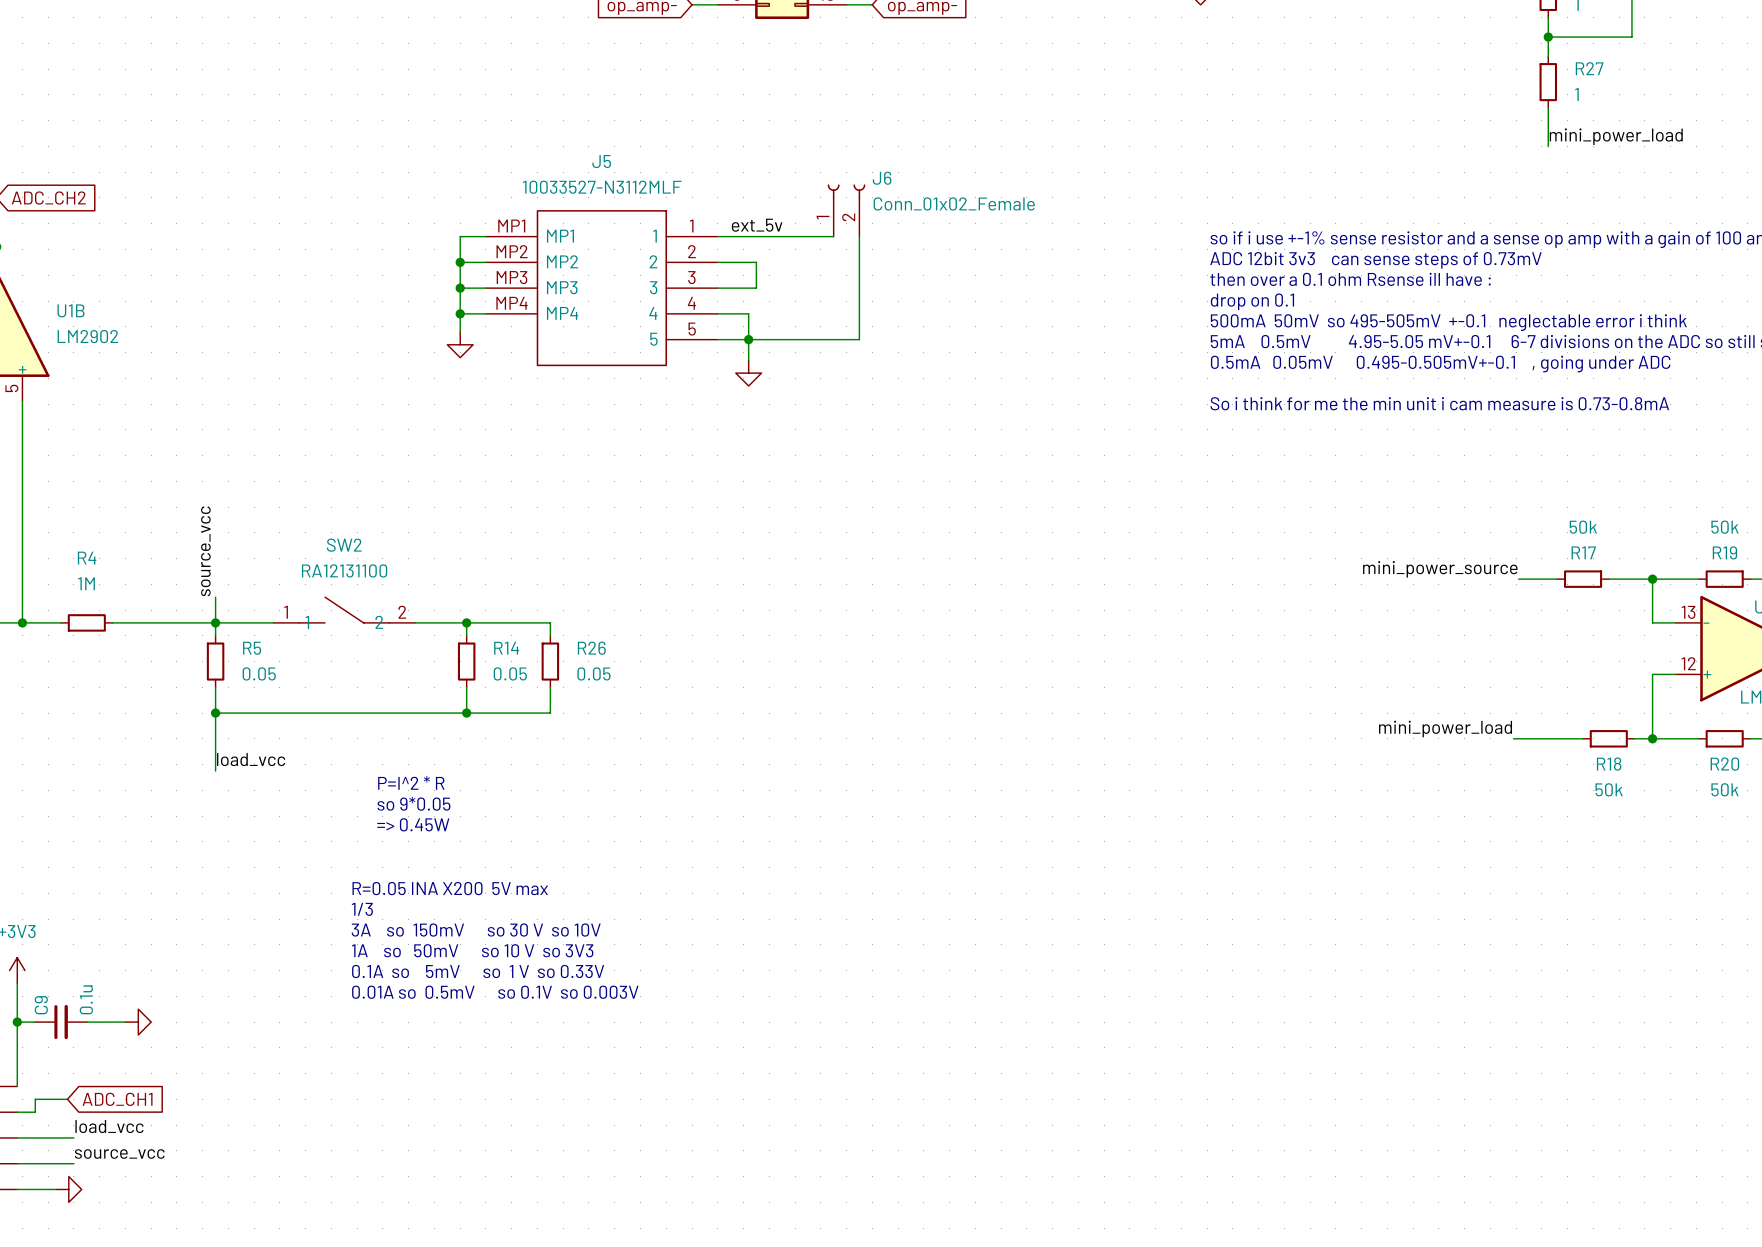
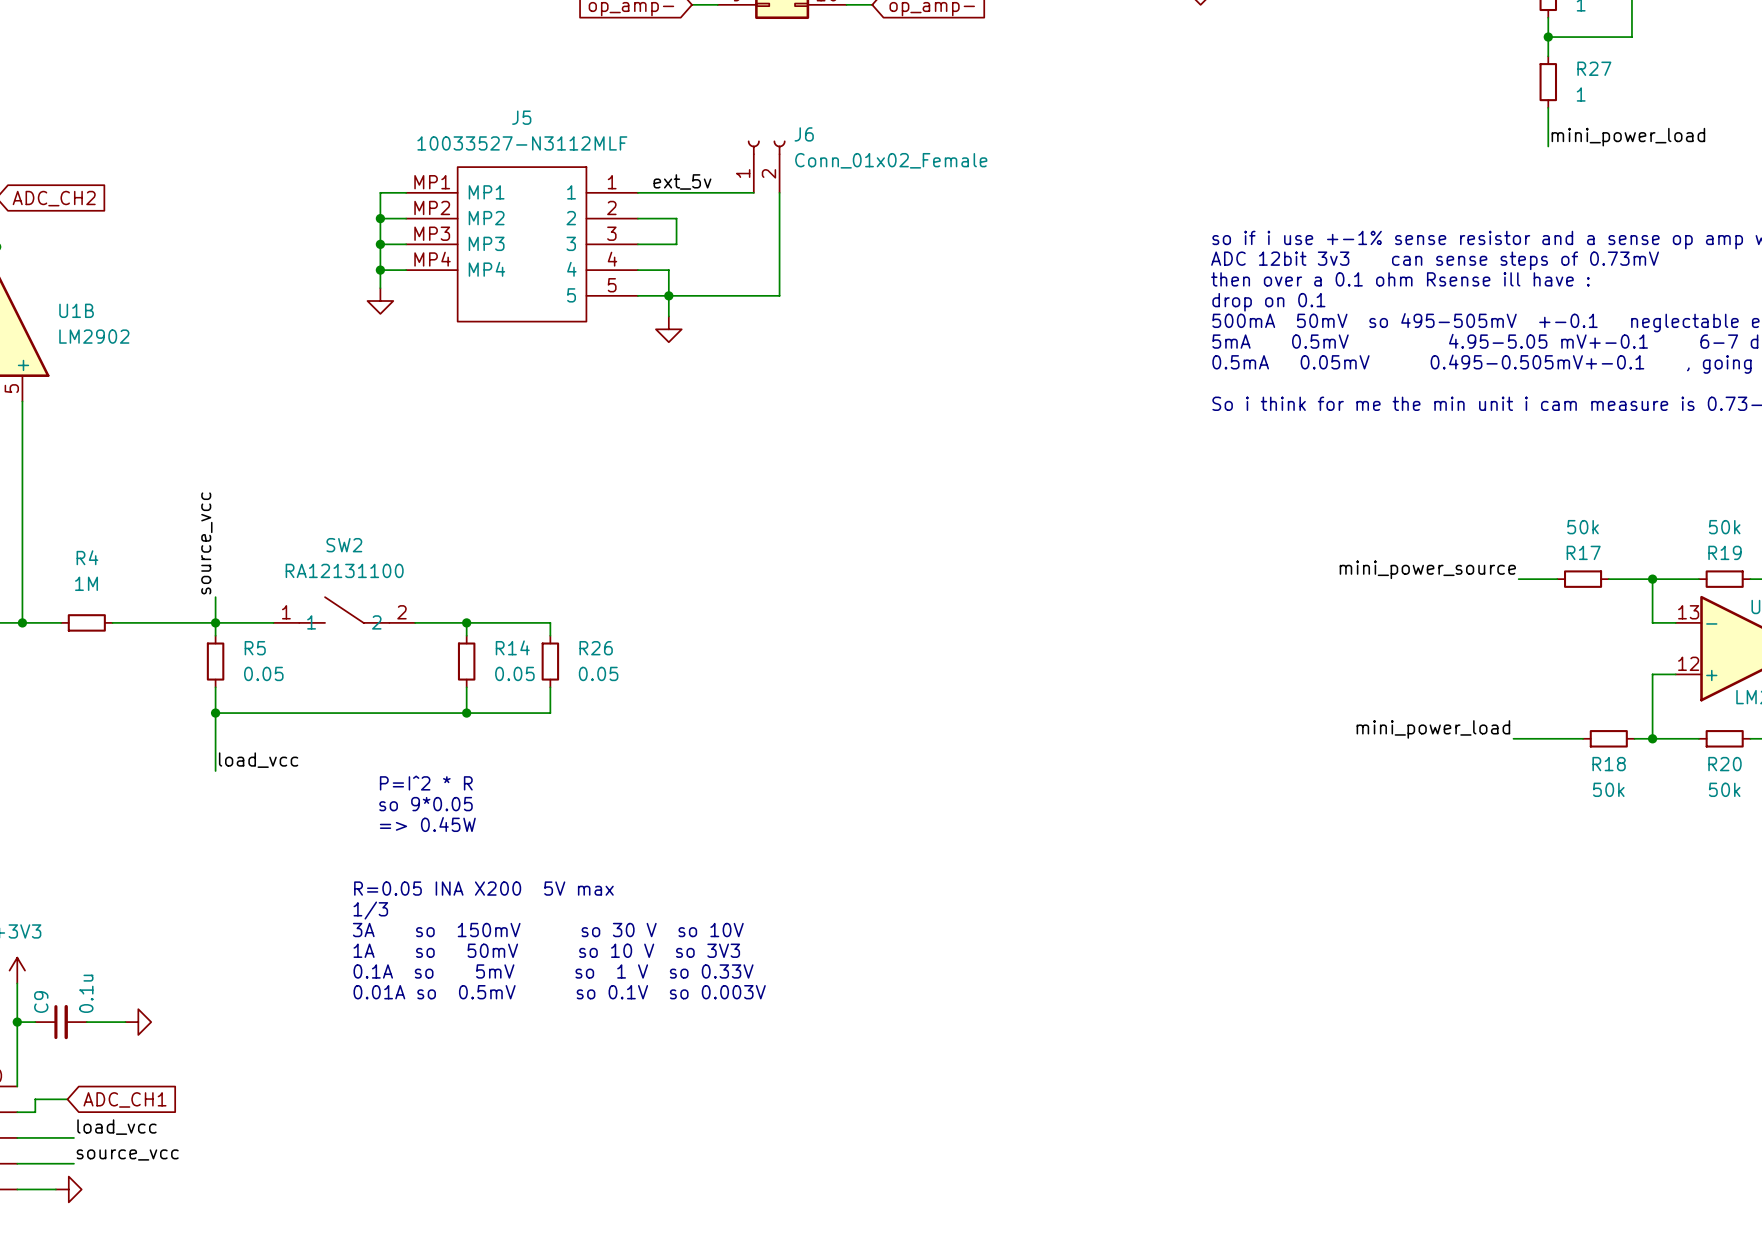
J6 position: (846, 210) -> (766, 166)
junction: none -> (380, 218)
label position: ext_5v (757, 225) -> ext_5v (682, 181)
wire: (485, 236) (460, 236) (460, 331) -> (406, 192) (380, 192) (380, 288)
wire: (717, 236) (833, 236) -> (637, 192) (753, 192)
wire: (859, 236) (859, 339) (717, 339) -> (779, 192) (779, 295) (637, 295)
junction: none -> (380, 244)
wire: (460, 262) (485, 262) -> (380, 218) (406, 218)
junction: (460, 262) -> none
wire: (717, 262) (756, 262) (756, 288) (717, 288) -> (637, 218) (676, 218) (676, 244) (637, 244)
junction: none -> (380, 270)
wire: (460, 288) (485, 288) -> (380, 244) (406, 244)
junction: (460, 288) -> none
J5 position: (601, 288) -> (522, 244)
junction: none -> (668, 295)
wire: (460, 313) (485, 313) -> (380, 270) (406, 270)
junction: (460, 313) -> none
wire: (717, 313) (748, 313) (748, 360) -> (637, 270) (668, 270) (668, 316)
junction: (748, 339) -> none
power symbol position: (460, 344) -> (380, 301)
power symbol position: (748, 373) -> (668, 329)

